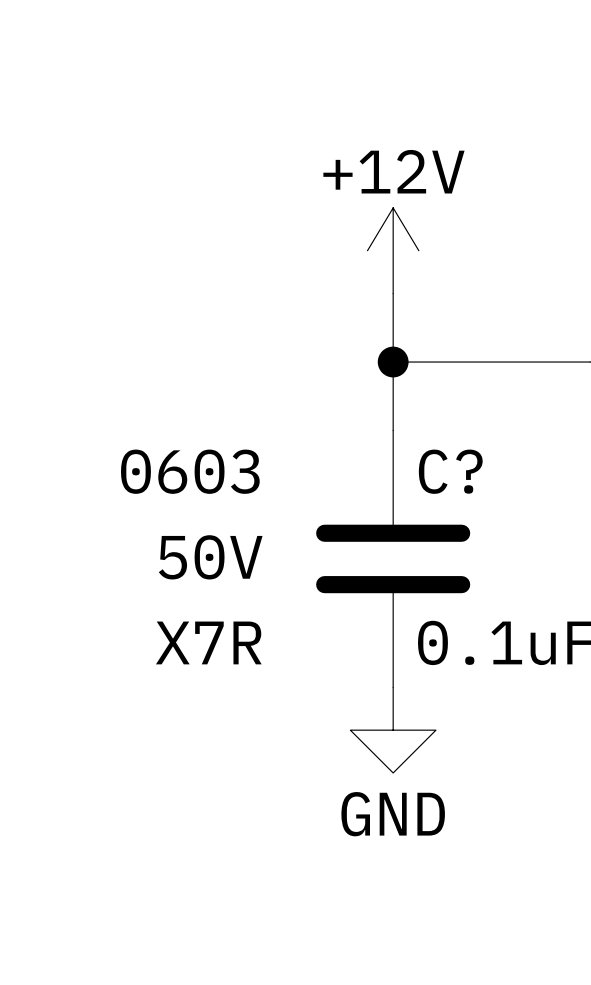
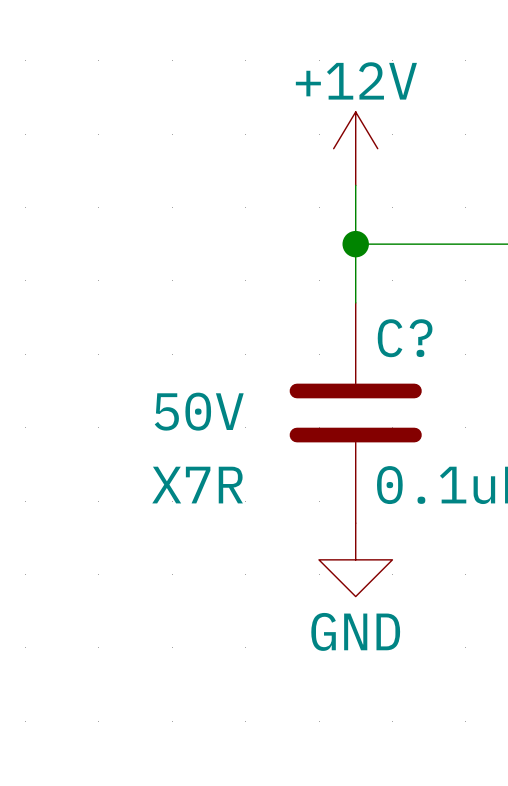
C? text: 0603 (190, 471) -> none

